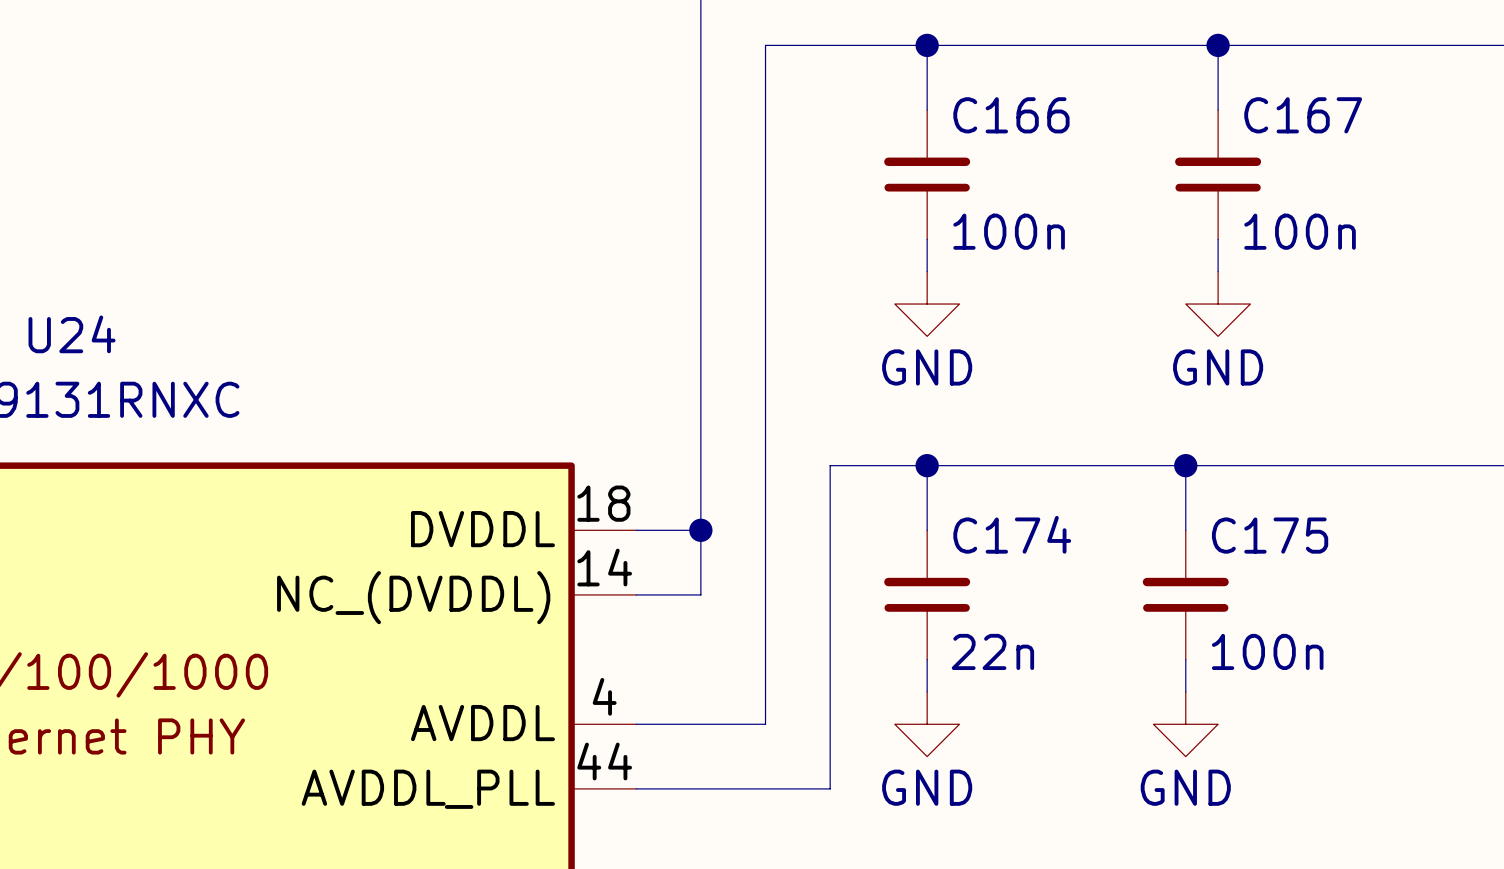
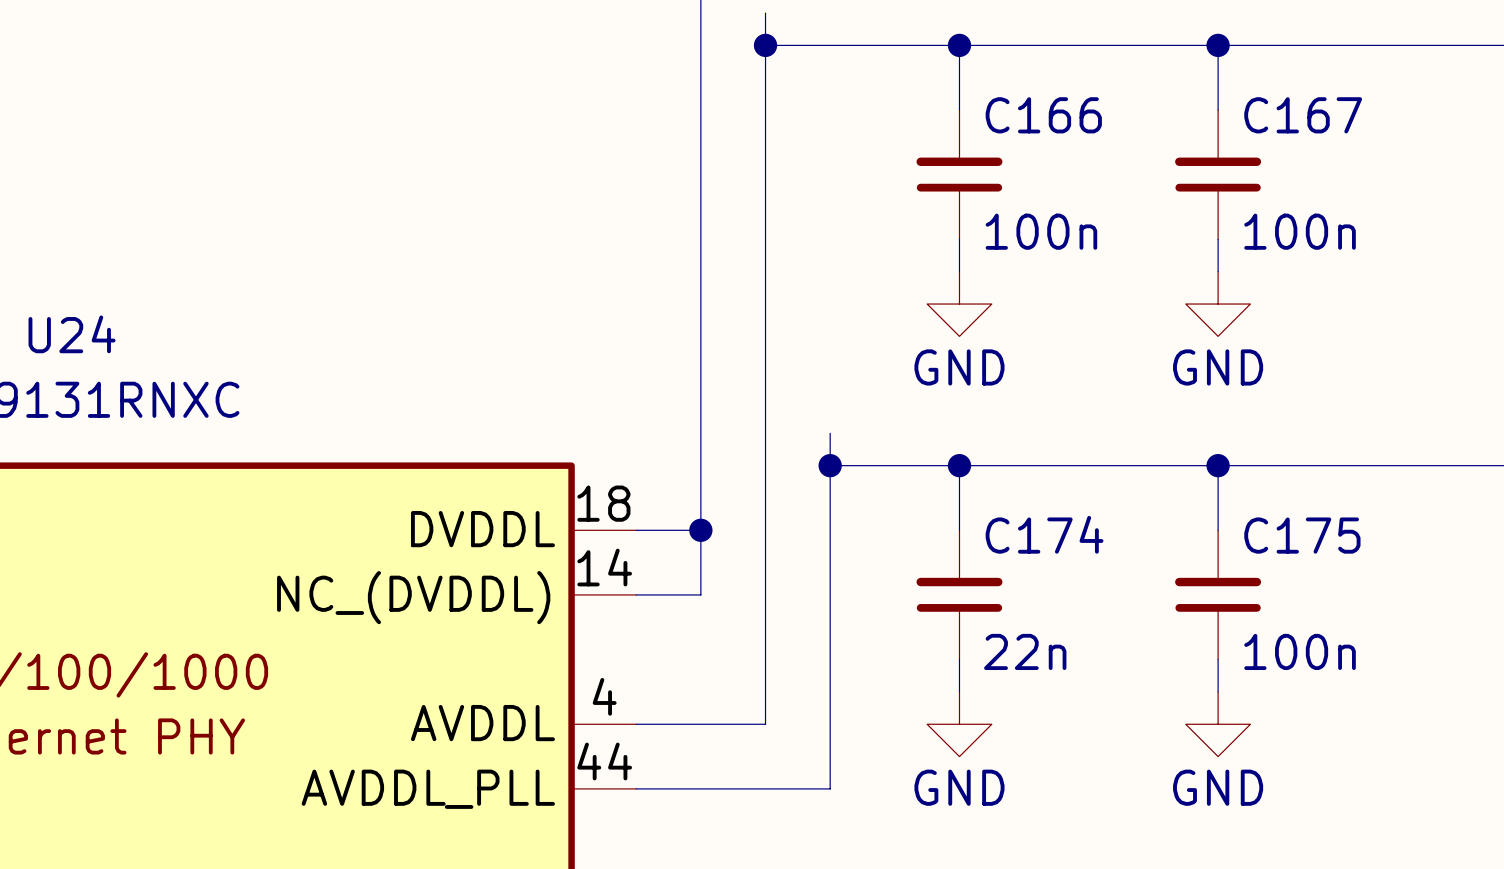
wire: none -> (765, 13) (765, 45)
junction: none -> (765, 45)
wire: (927, 45) (927, 110) -> (959, 45) (959, 110)
junction position: (927, 45) -> (959, 45)
C166 position: (927, 174) -> (959, 174)
wire: (927, 239) (927, 271) -> (959, 239) (959, 271)
power symbol position: GND (927, 304) -> GND (959, 304)
wire: none -> (830, 433) (830, 465)
junction: none -> (830, 465)
wire: (927, 465) (927, 530) -> (959, 465) (959, 530)
junction position: (927, 465) -> (959, 465)
wire: (1185, 465) (1185, 530) -> (1218, 465) (1218, 530)
junction position: (1185, 465) -> (1218, 465)
C174 position: (927, 594) -> (959, 594)
C175 position: (1185, 594) -> (1218, 594)
wire: (927, 659) (927, 691) -> (959, 659) (959, 691)
wire: (1185, 659) (1185, 691) -> (1218, 659) (1218, 691)
power symbol position: GND (927, 724) -> GND (959, 724)
power symbol position: GND (1185, 724) -> GND (1218, 724)

